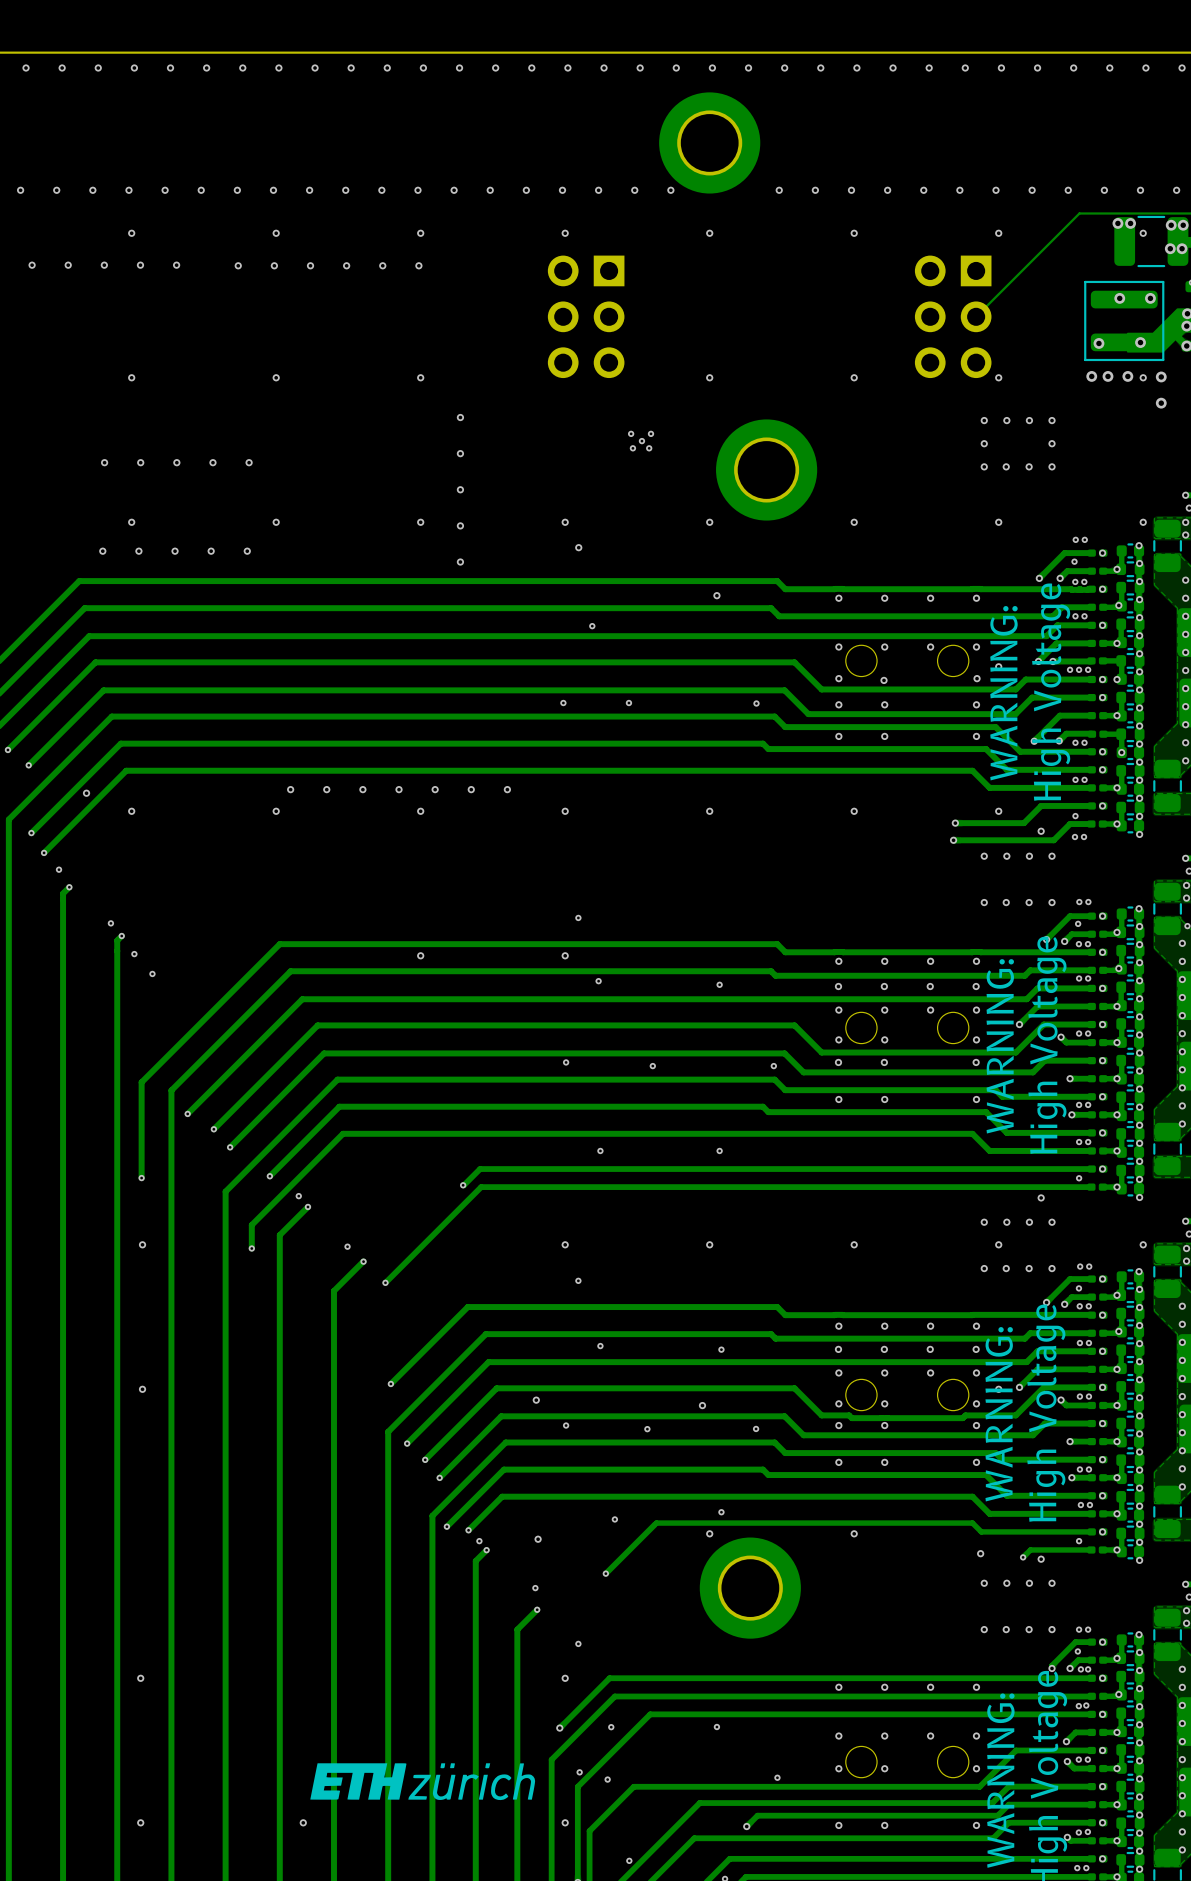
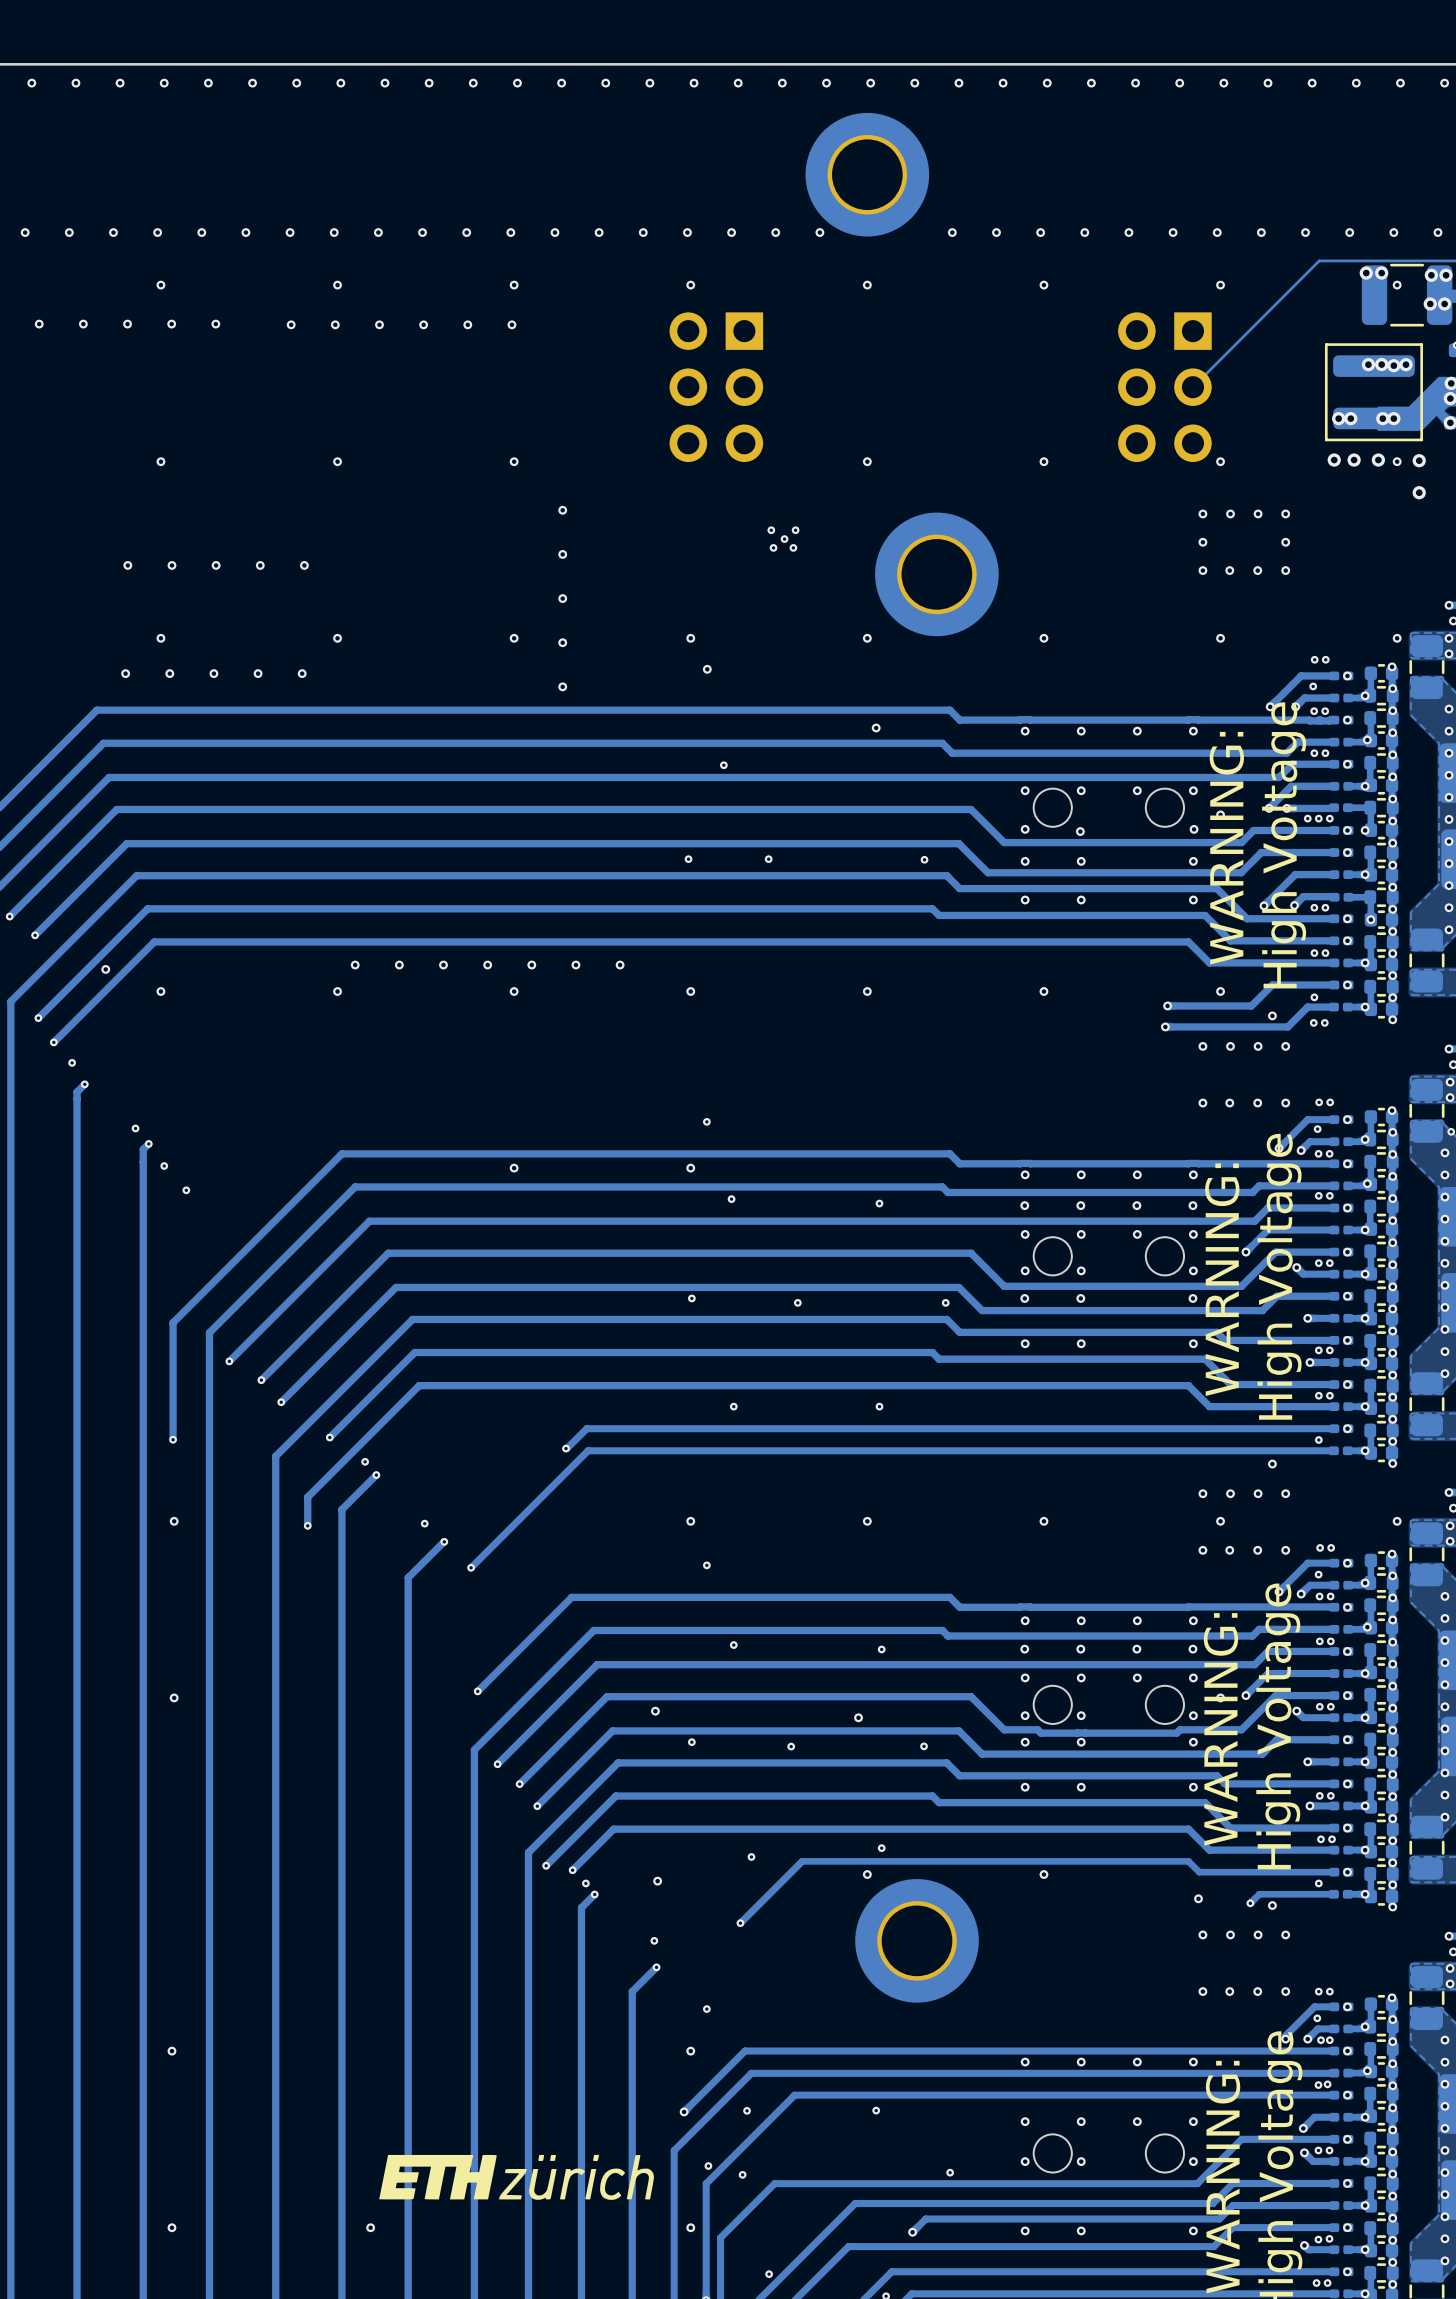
via: none -> (1381, 364)
via: none -> (1393, 365)
via: none -> (1338, 418)
via: none -> (1350, 418)
via: none -> (1382, 418)
via: (1098, 343) -> none

